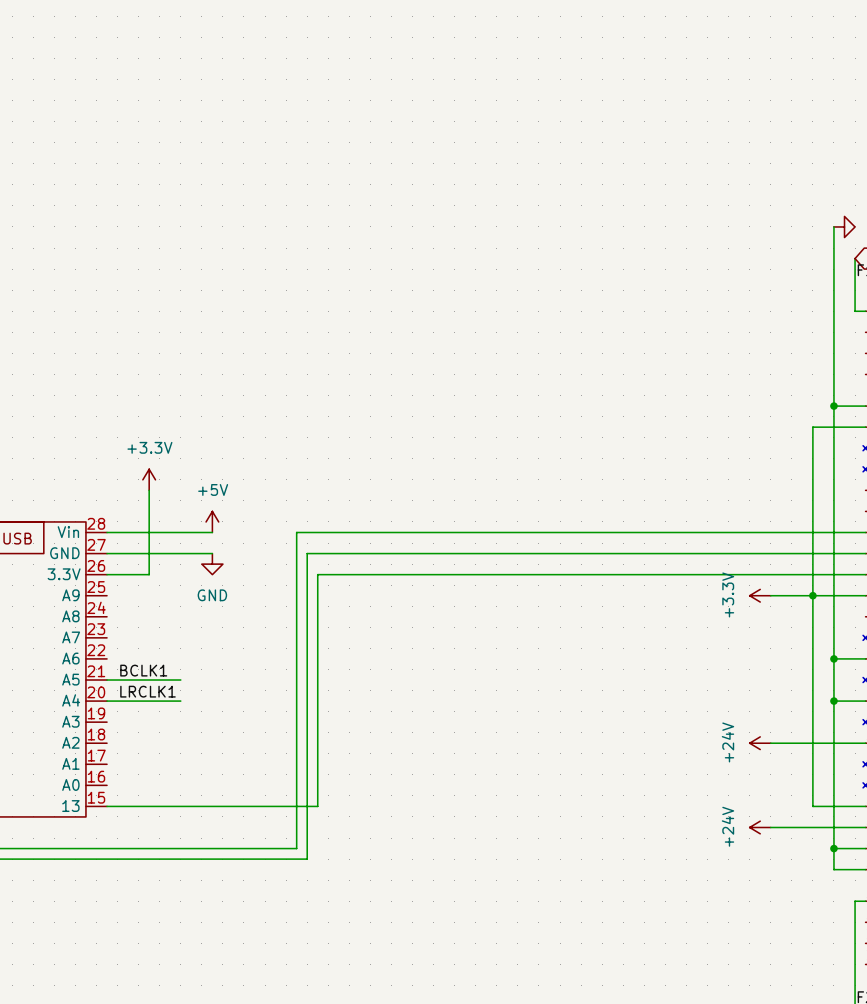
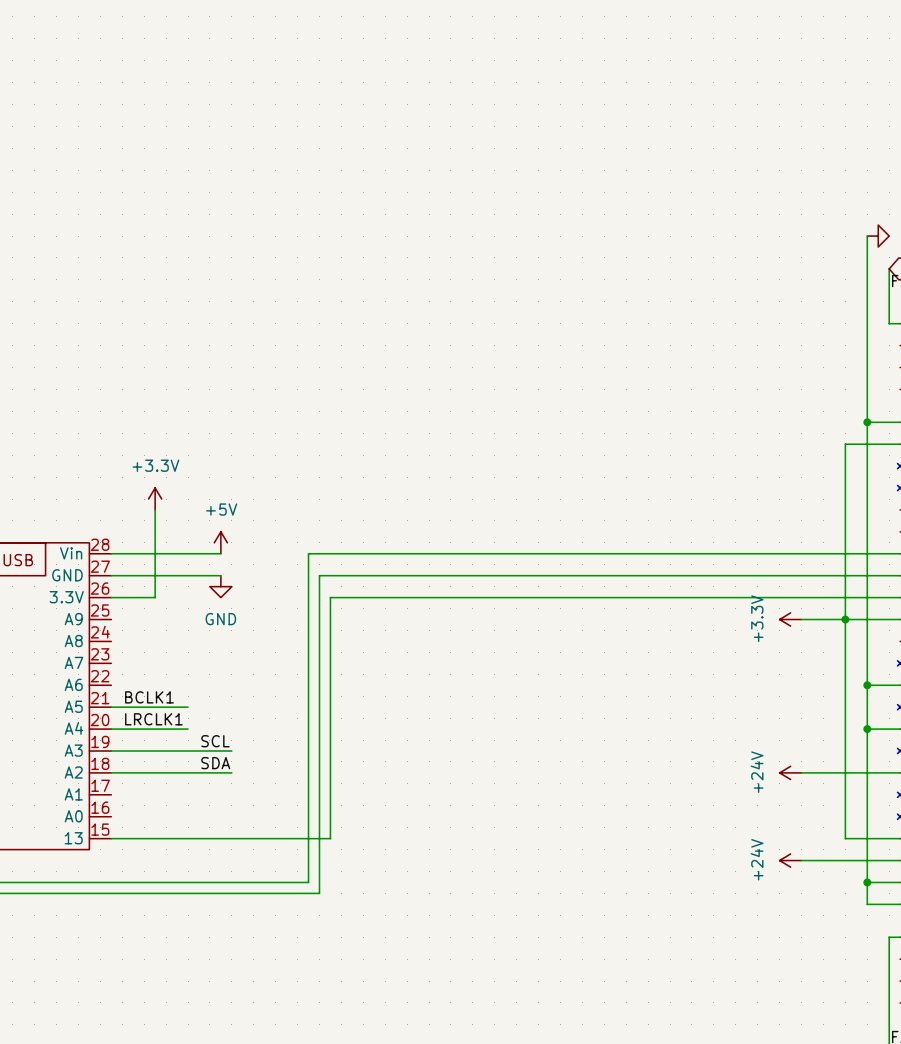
label: none -> SCL (215, 741)
wire: none -> (111, 750) (231, 750)
label: none -> SDA (215, 763)
wire: none -> (111, 772) (231, 772)

